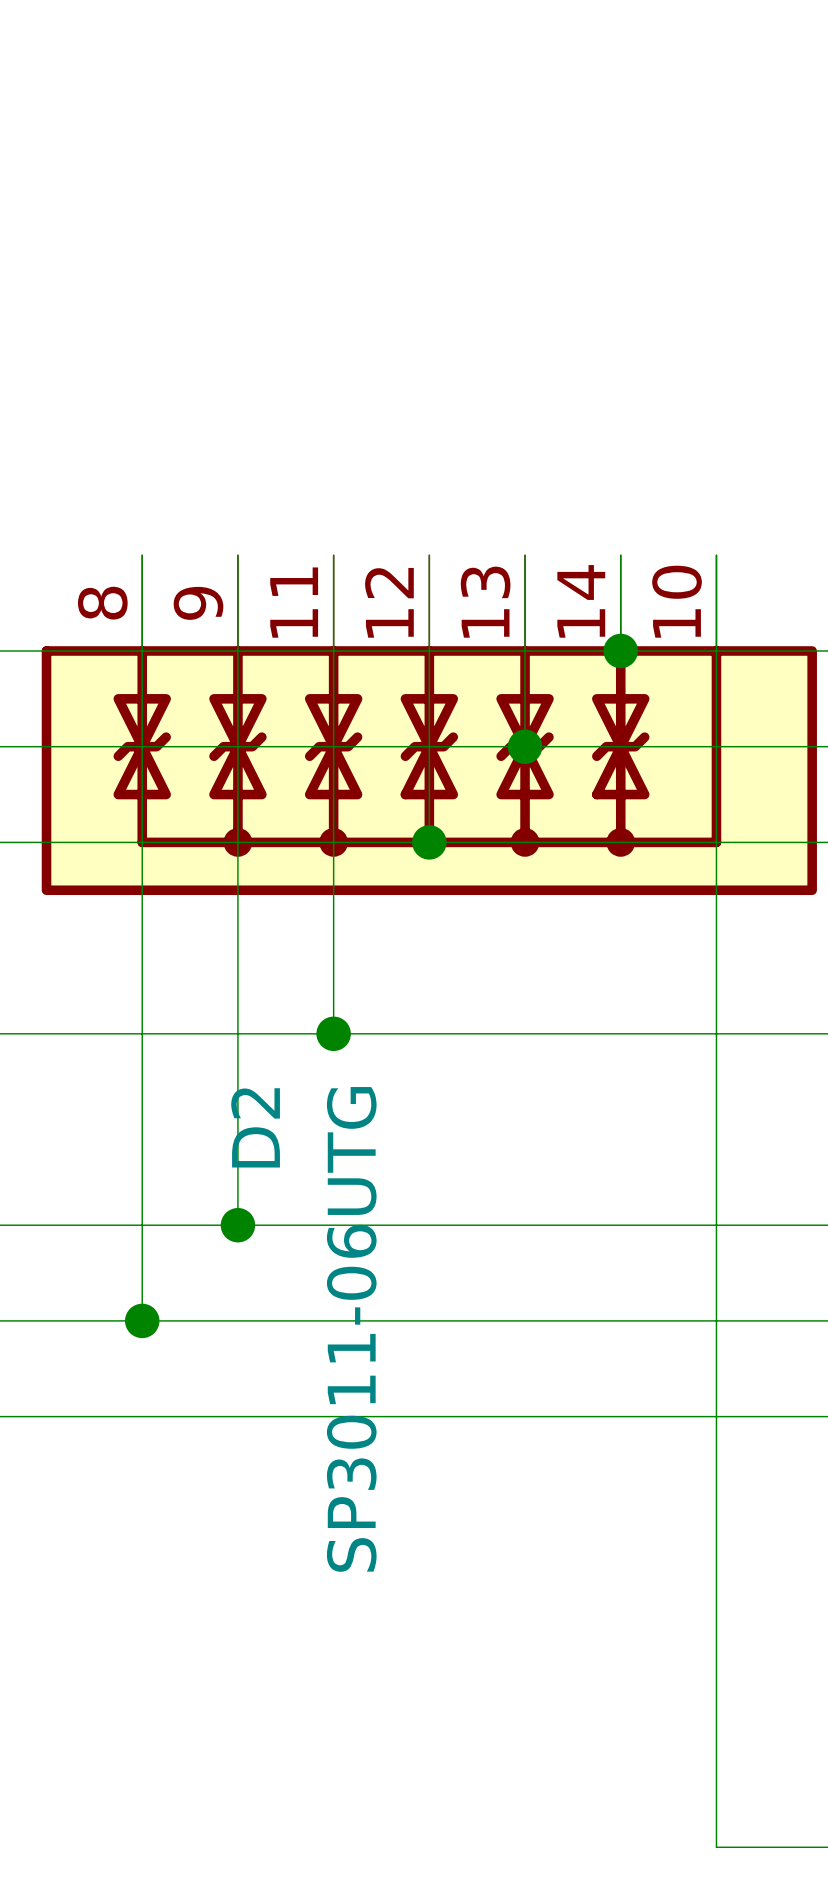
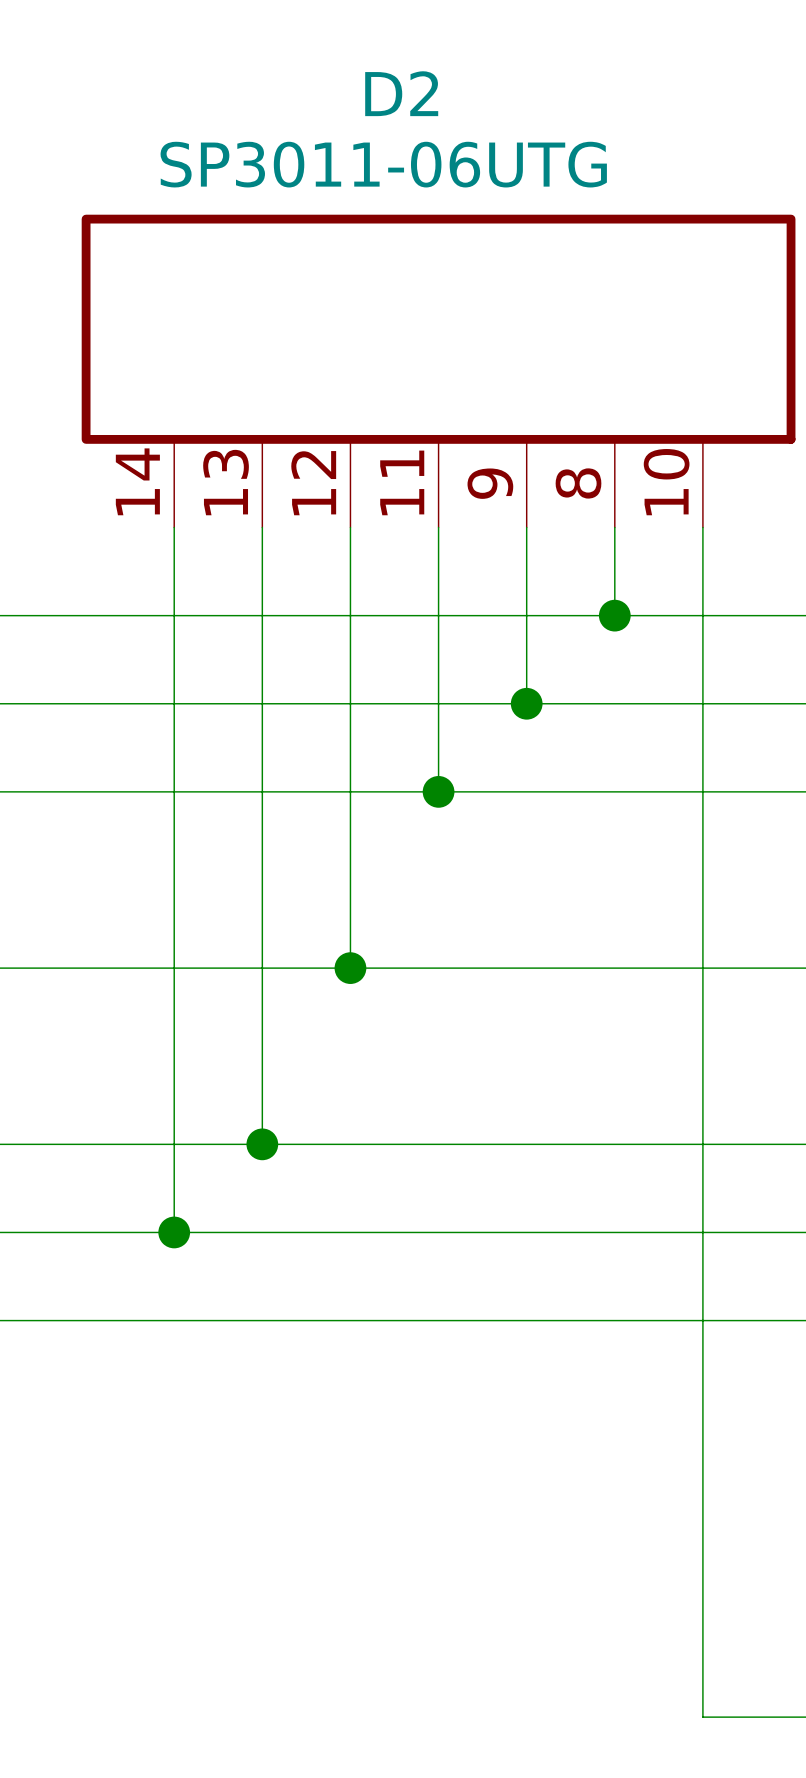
D2 symbol: [41, 555, 817, 896] -> [81, 214, 796, 528]
D2 name position: D2 (255, 1127) -> D2 (401, 93)
D2 value position: SP3011-06UTG (351, 1329) -> SP3011-06UTG (383, 164)

